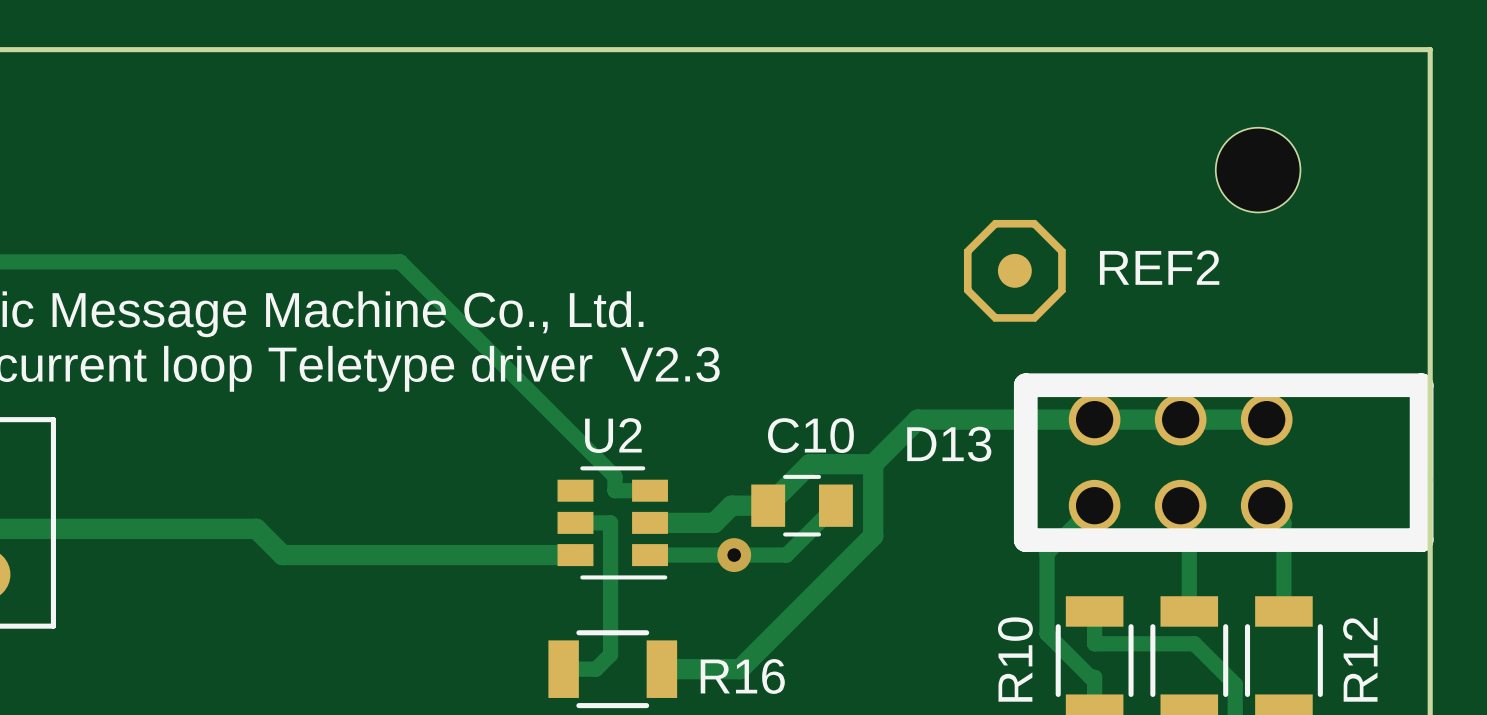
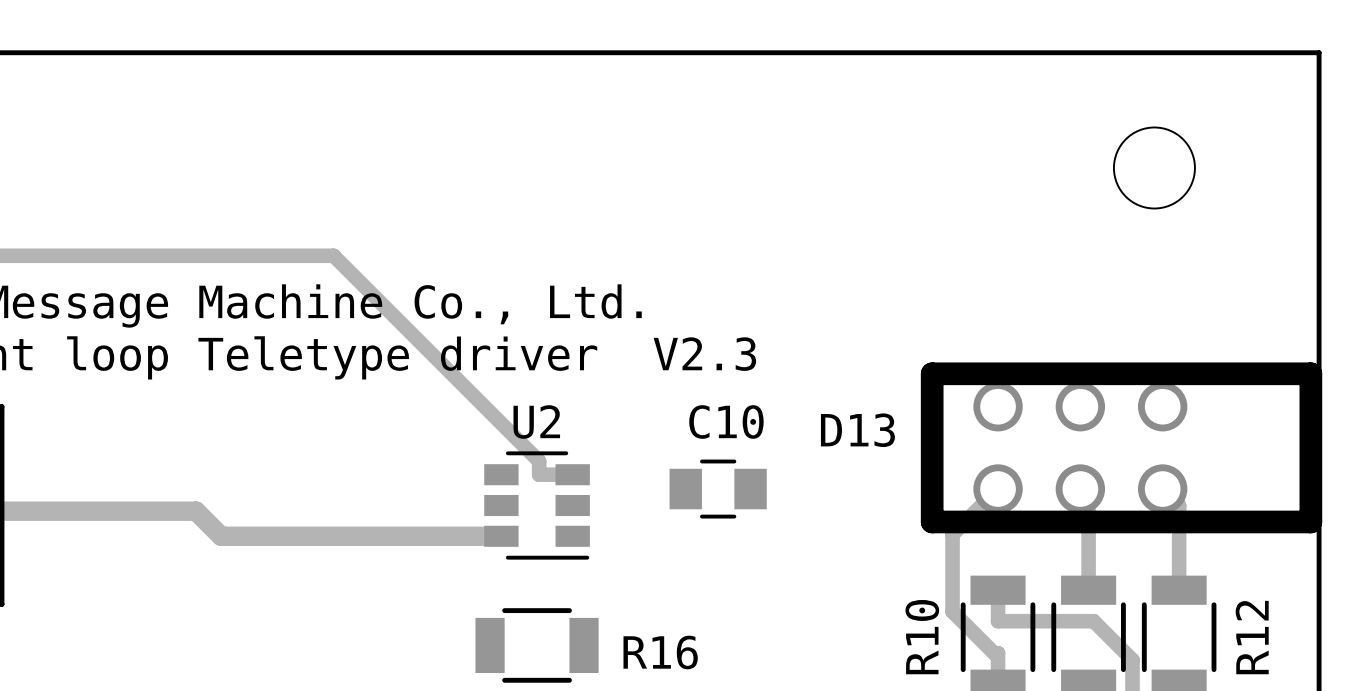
REF2: (1014, 270) -> none
track: (1266, 419) (917, 419) (873, 464) -> none
track: (873, 464) (873, 536) (740, 669) (661, 669) -> none
track: (873, 464) (809, 464) (768, 505) (731, 505) (714, 522) (650, 522) -> none
track: (835, 505) (786, 555) (650, 555) -> none
track: (575, 522) (610, 522) (610, 654) (596, 669) (563, 669) -> none
via: (734, 555) -> none

